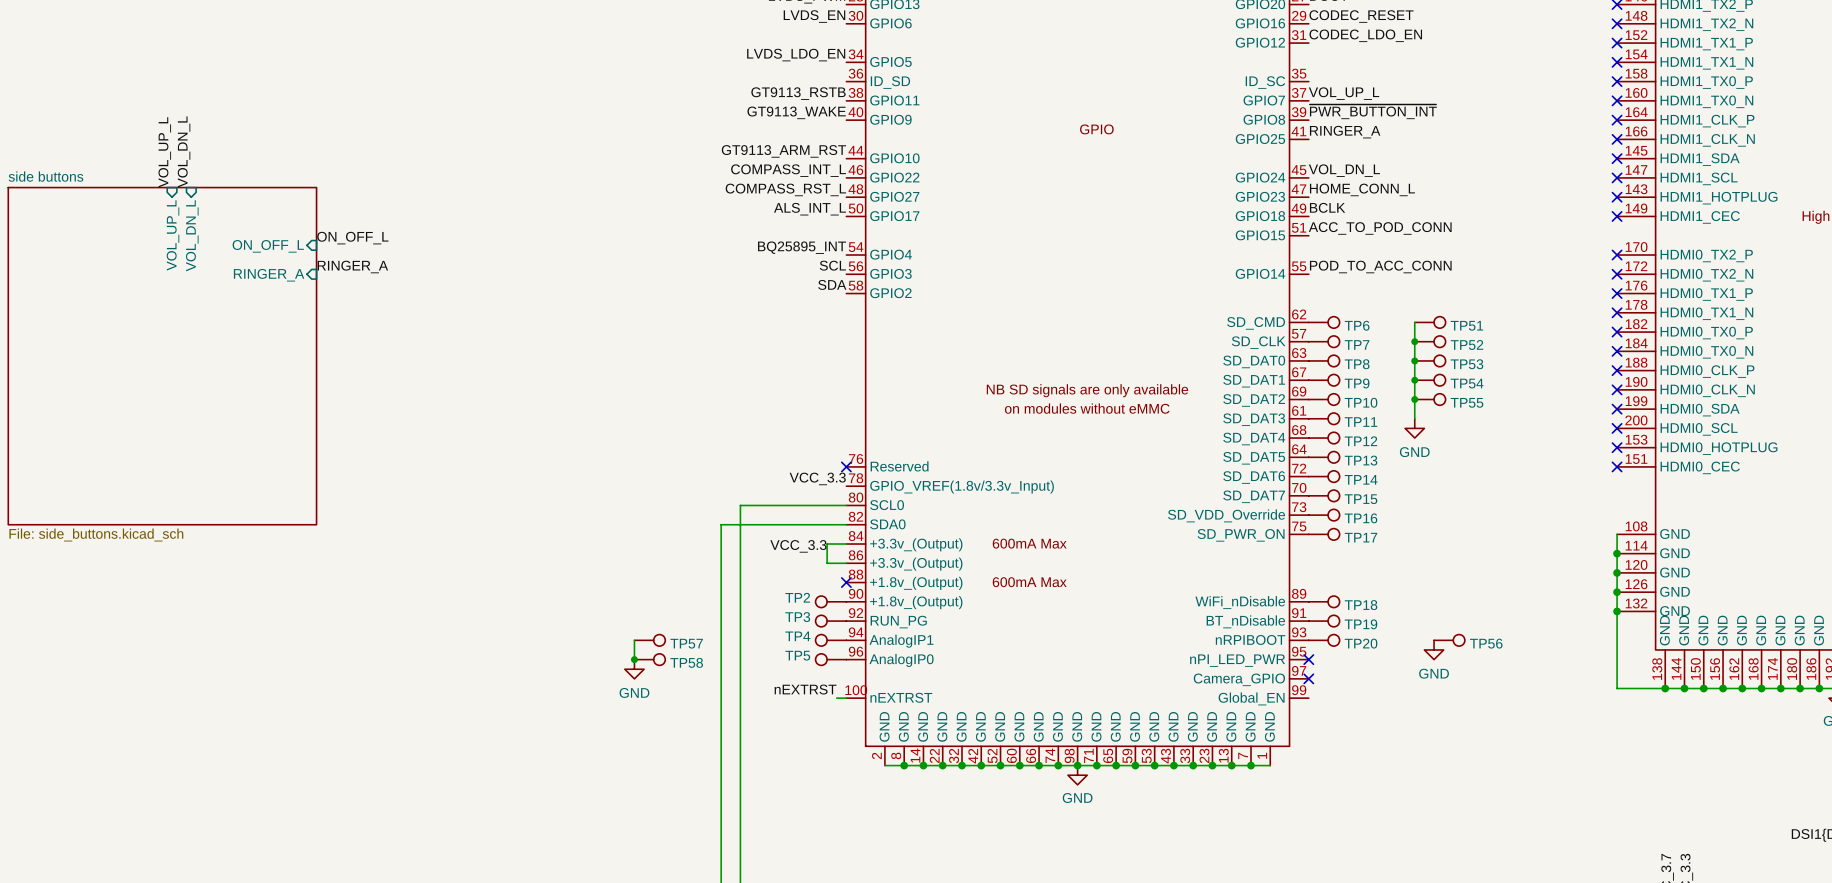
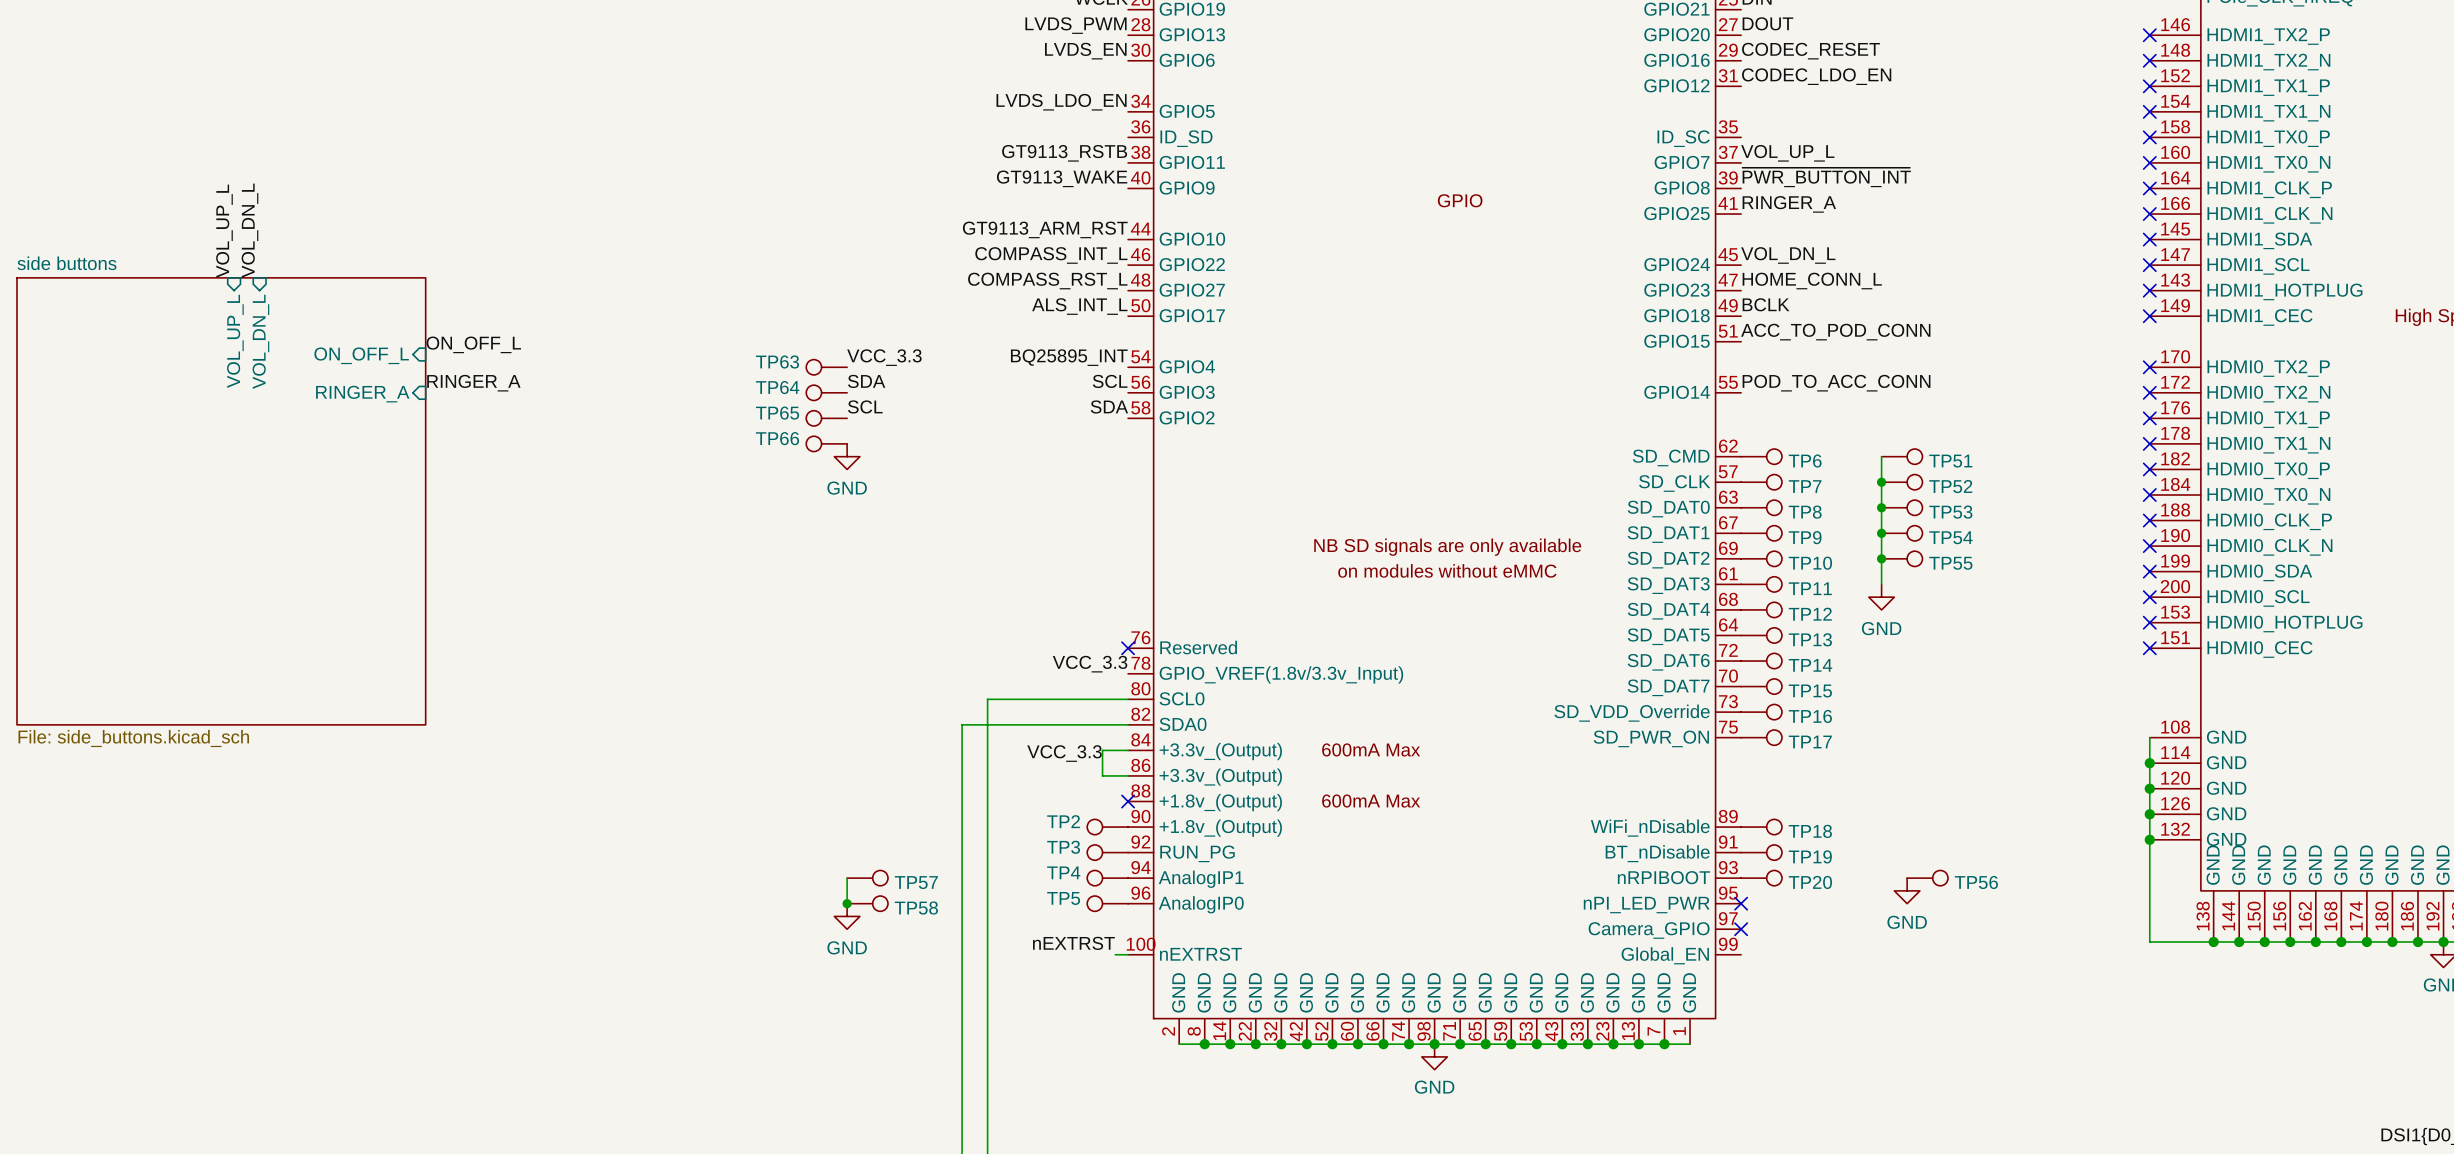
label: none -> VCC_3.3 (884, 357)
TP63: none -> (826, 367)
label: none -> SDA (866, 381)
TP64: none -> (826, 392)
label: none -> SCL (865, 406)
TP65: none -> (826, 418)
TP66: none -> (826, 443)
power symbol: none -> GND (847, 456)

